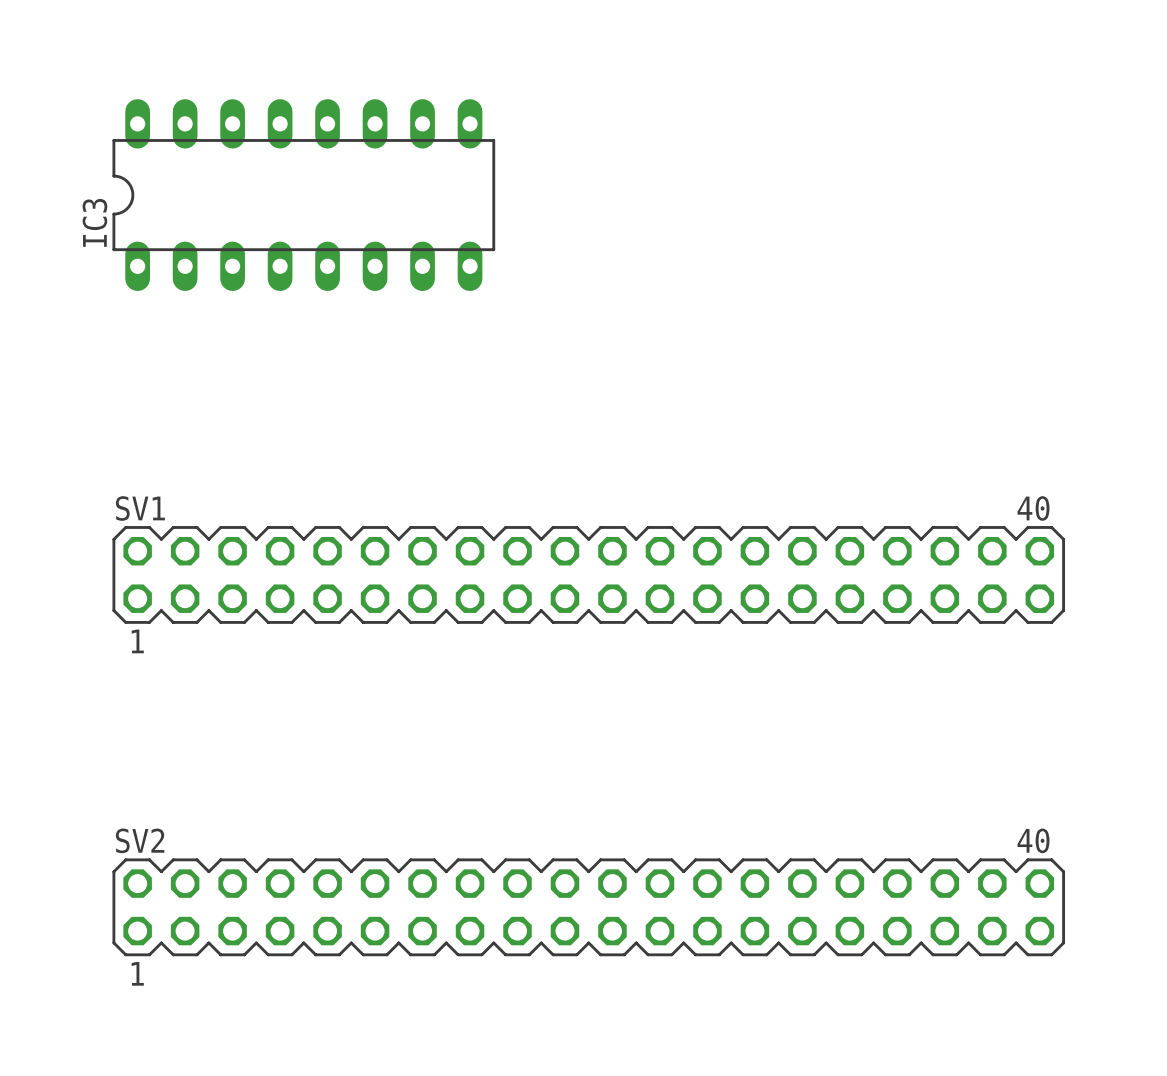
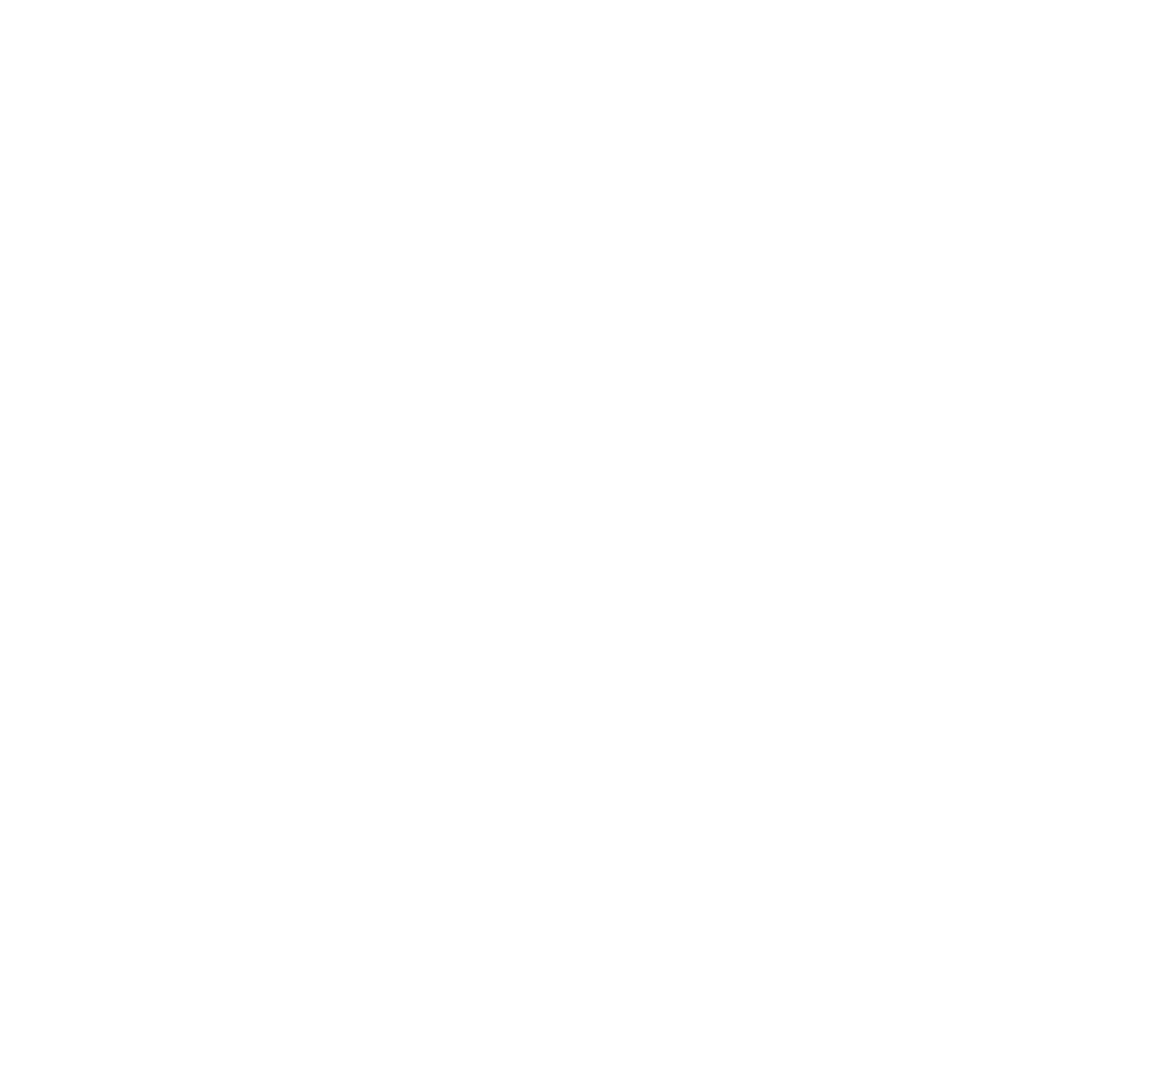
IC3: (303, 195) -> none
SV1: (588, 574) -> none
SV2: (588, 907) -> none

